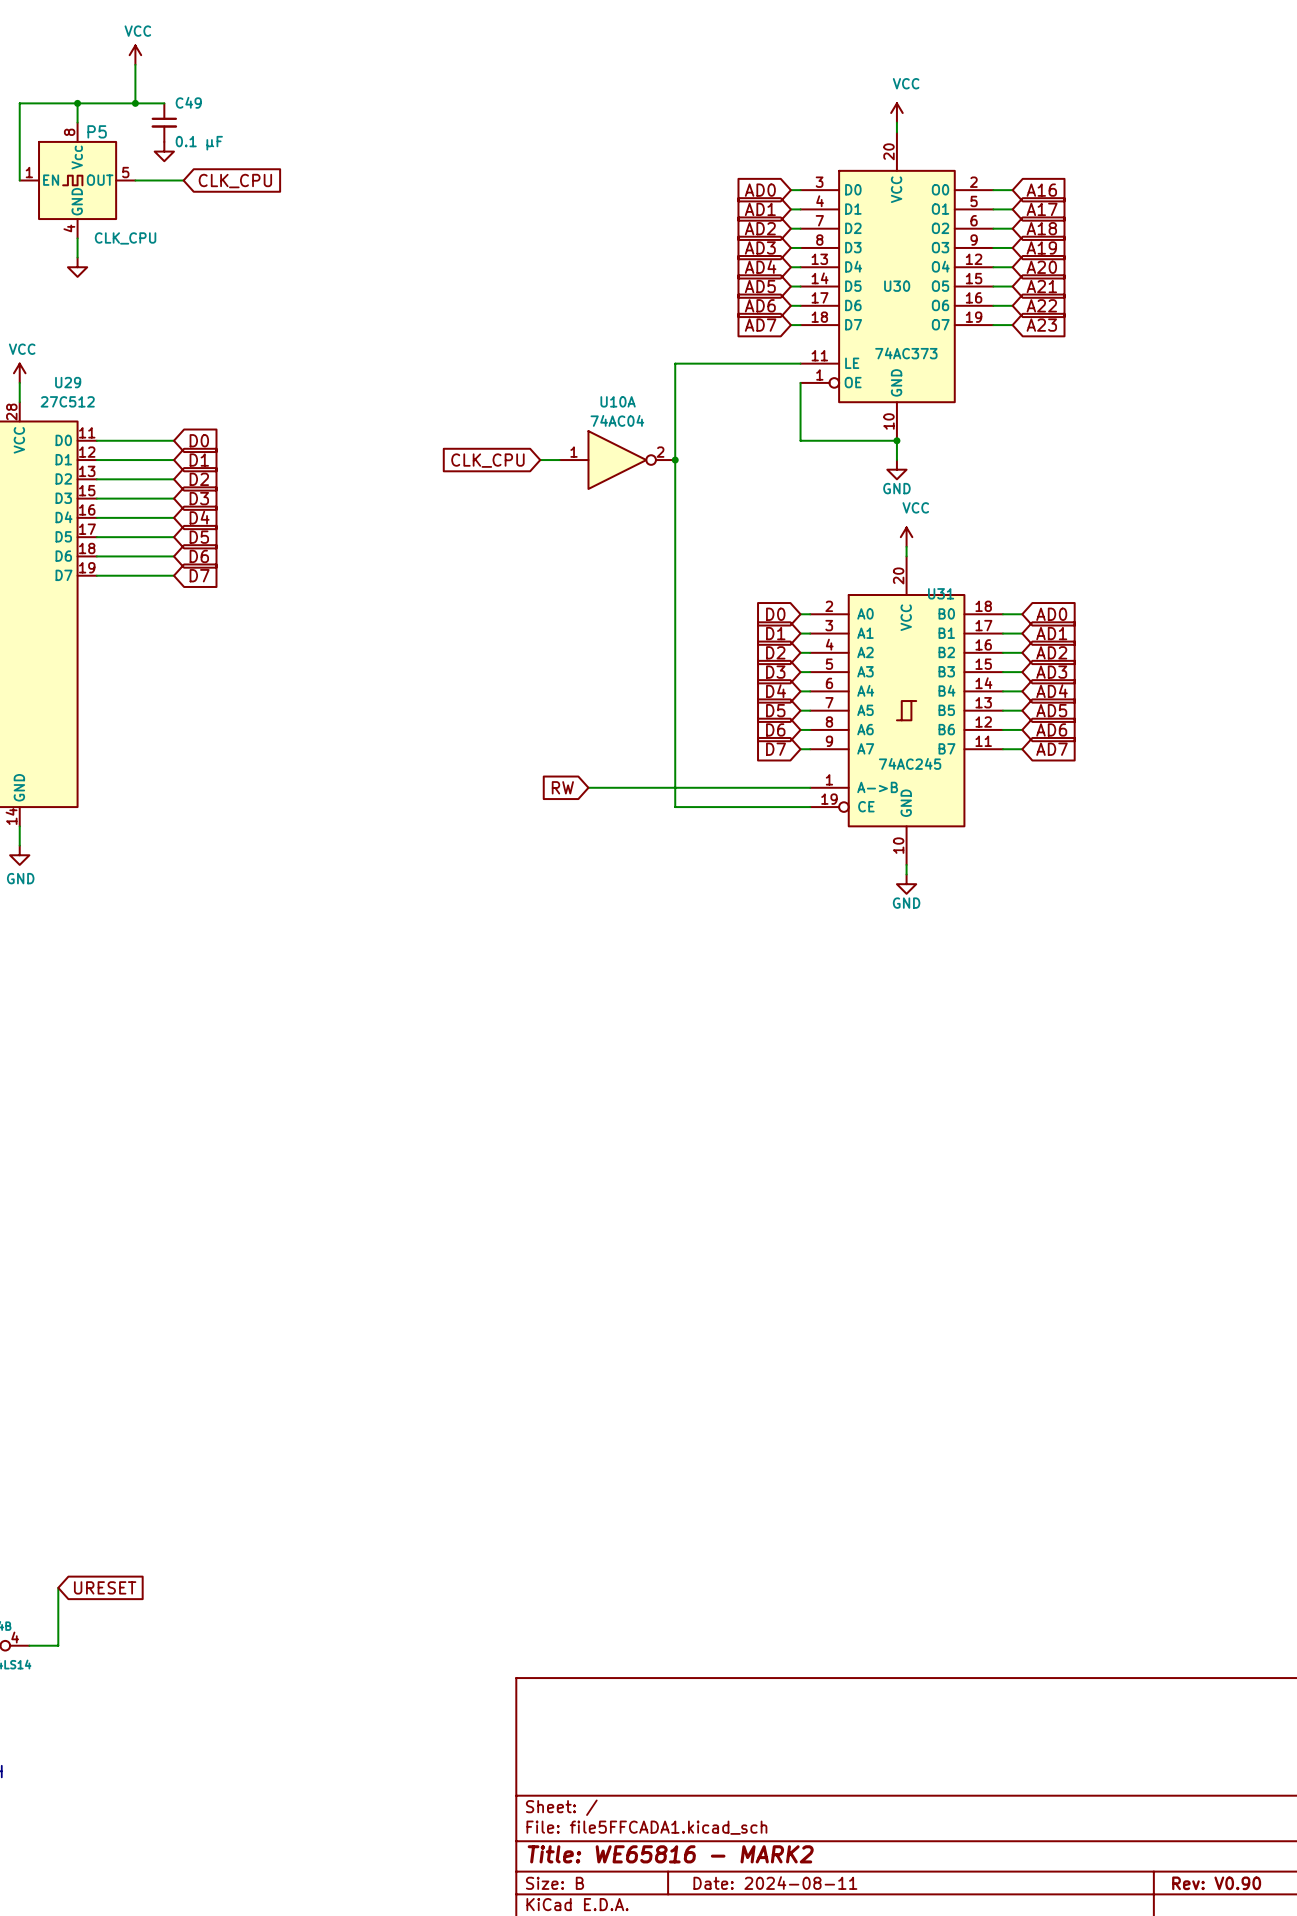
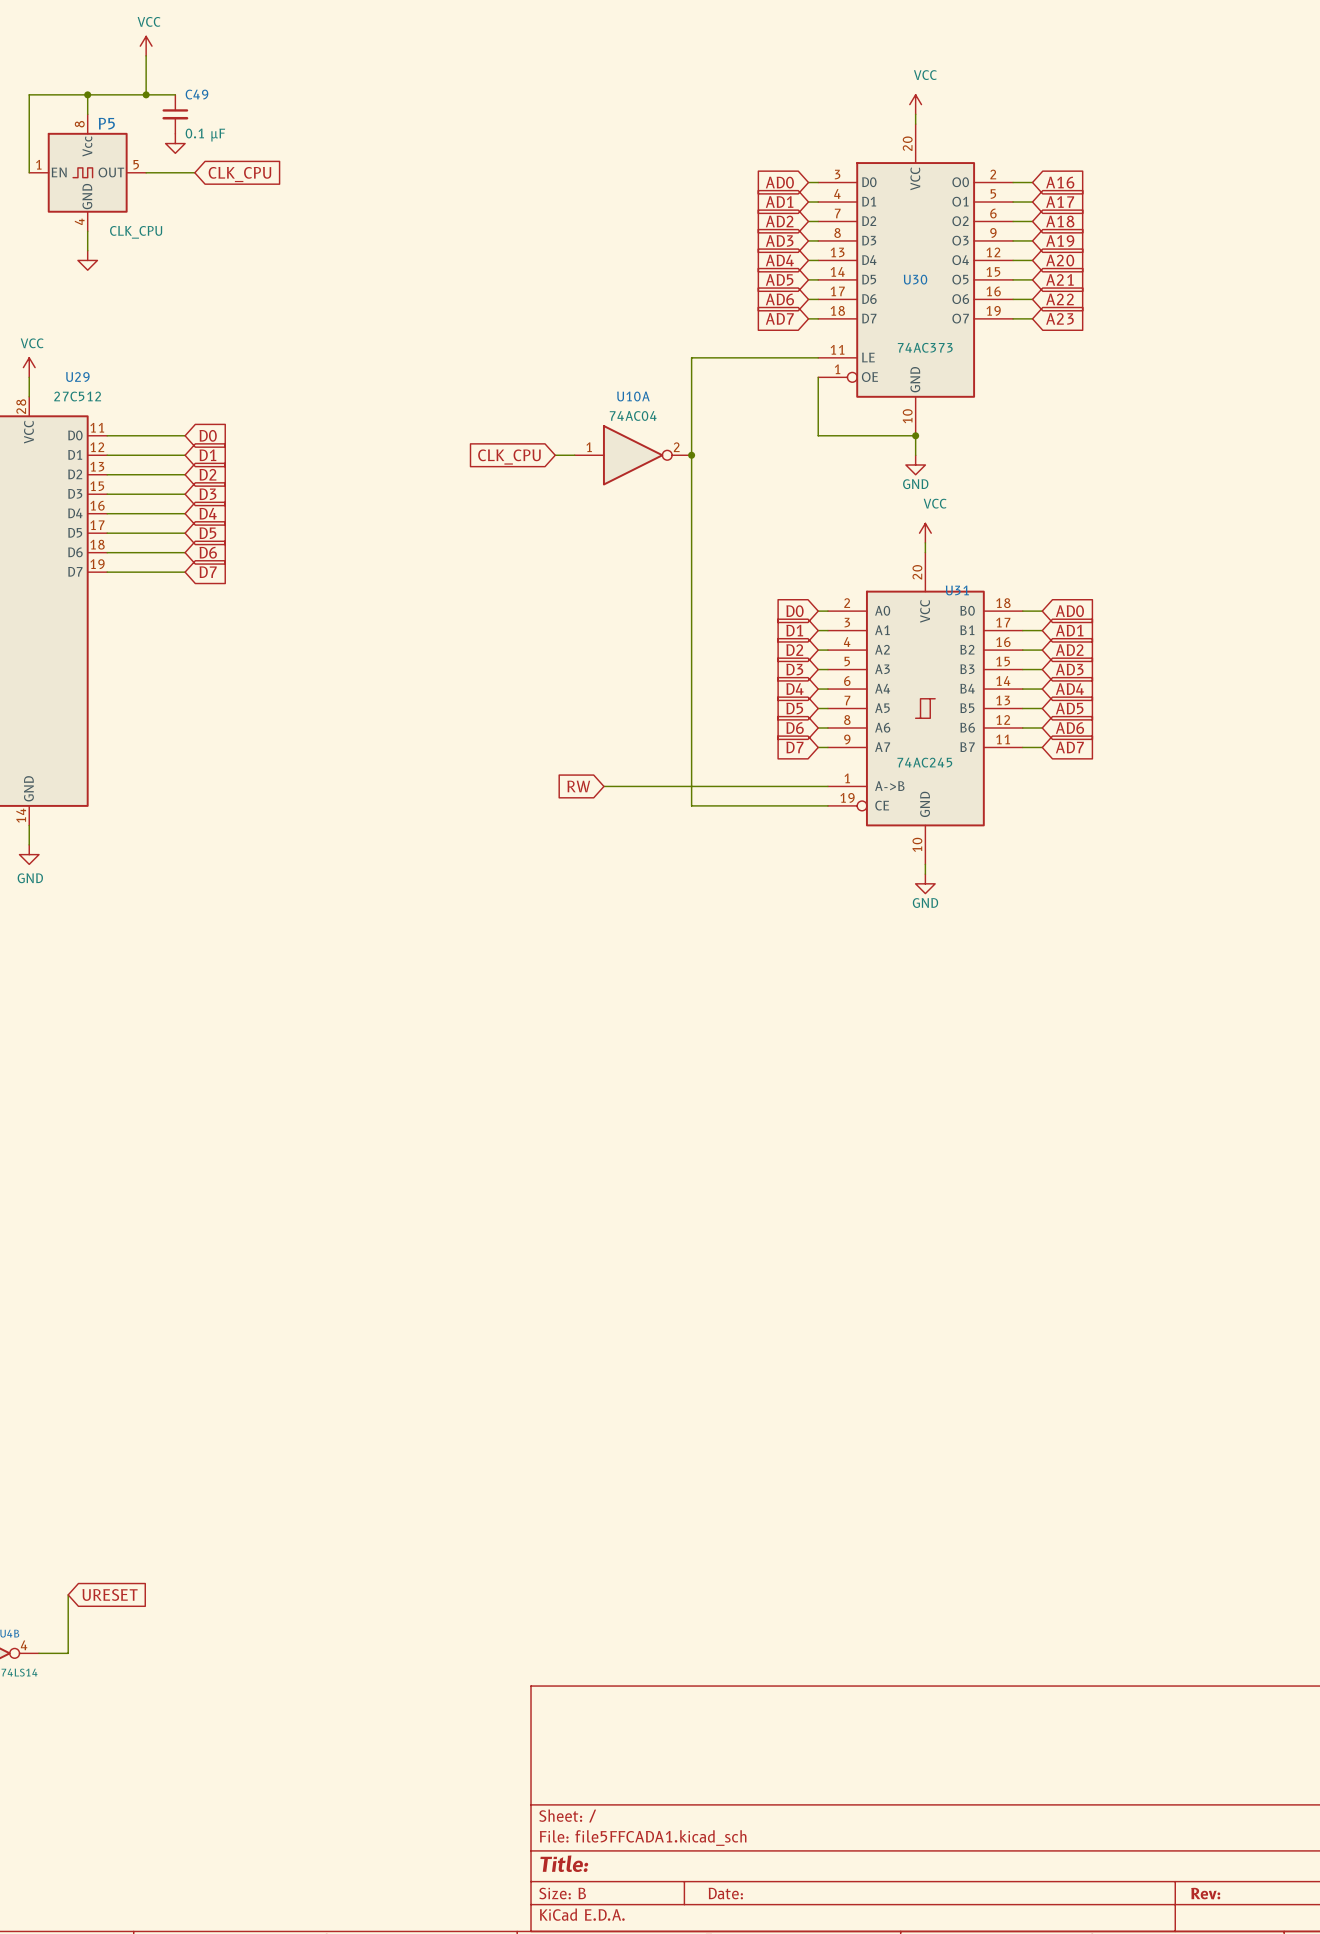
title block: Title: WE65816 - MARK2 (670, 1854) -> Title: (564, 1863)
title block: Date: 2024-08-11 (775, 1883) -> Date: (725, 1893)
title block: Rev: V0.90 (1216, 1883) -> Rev: (1205, 1893)

